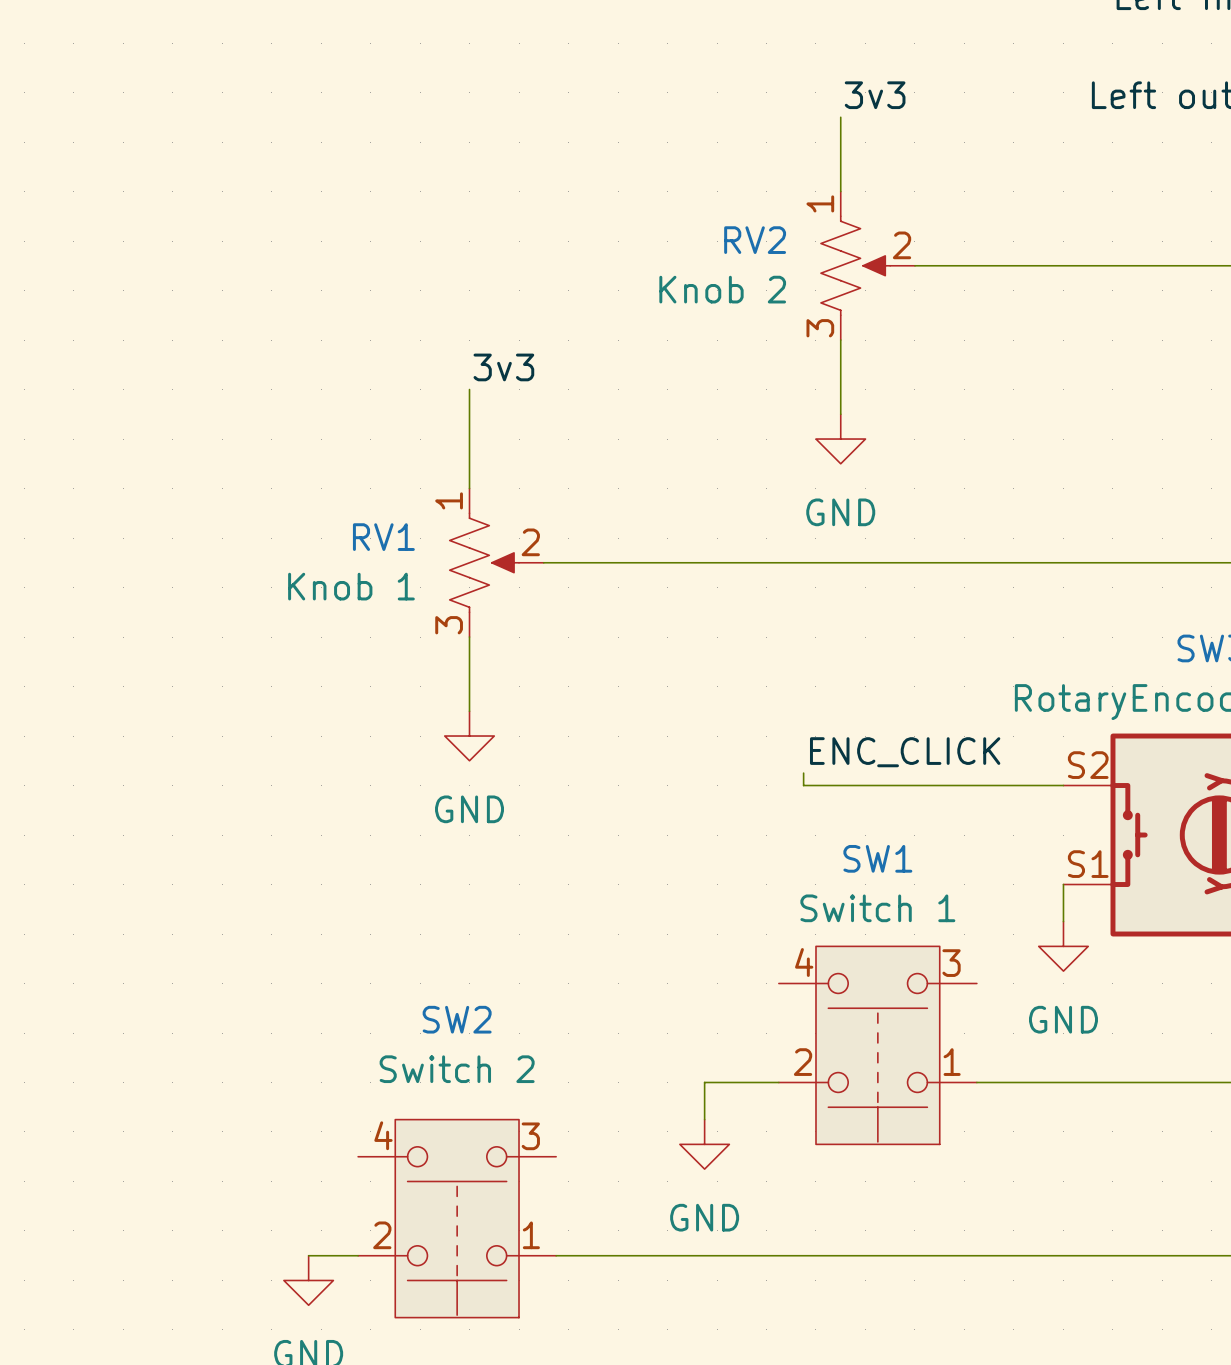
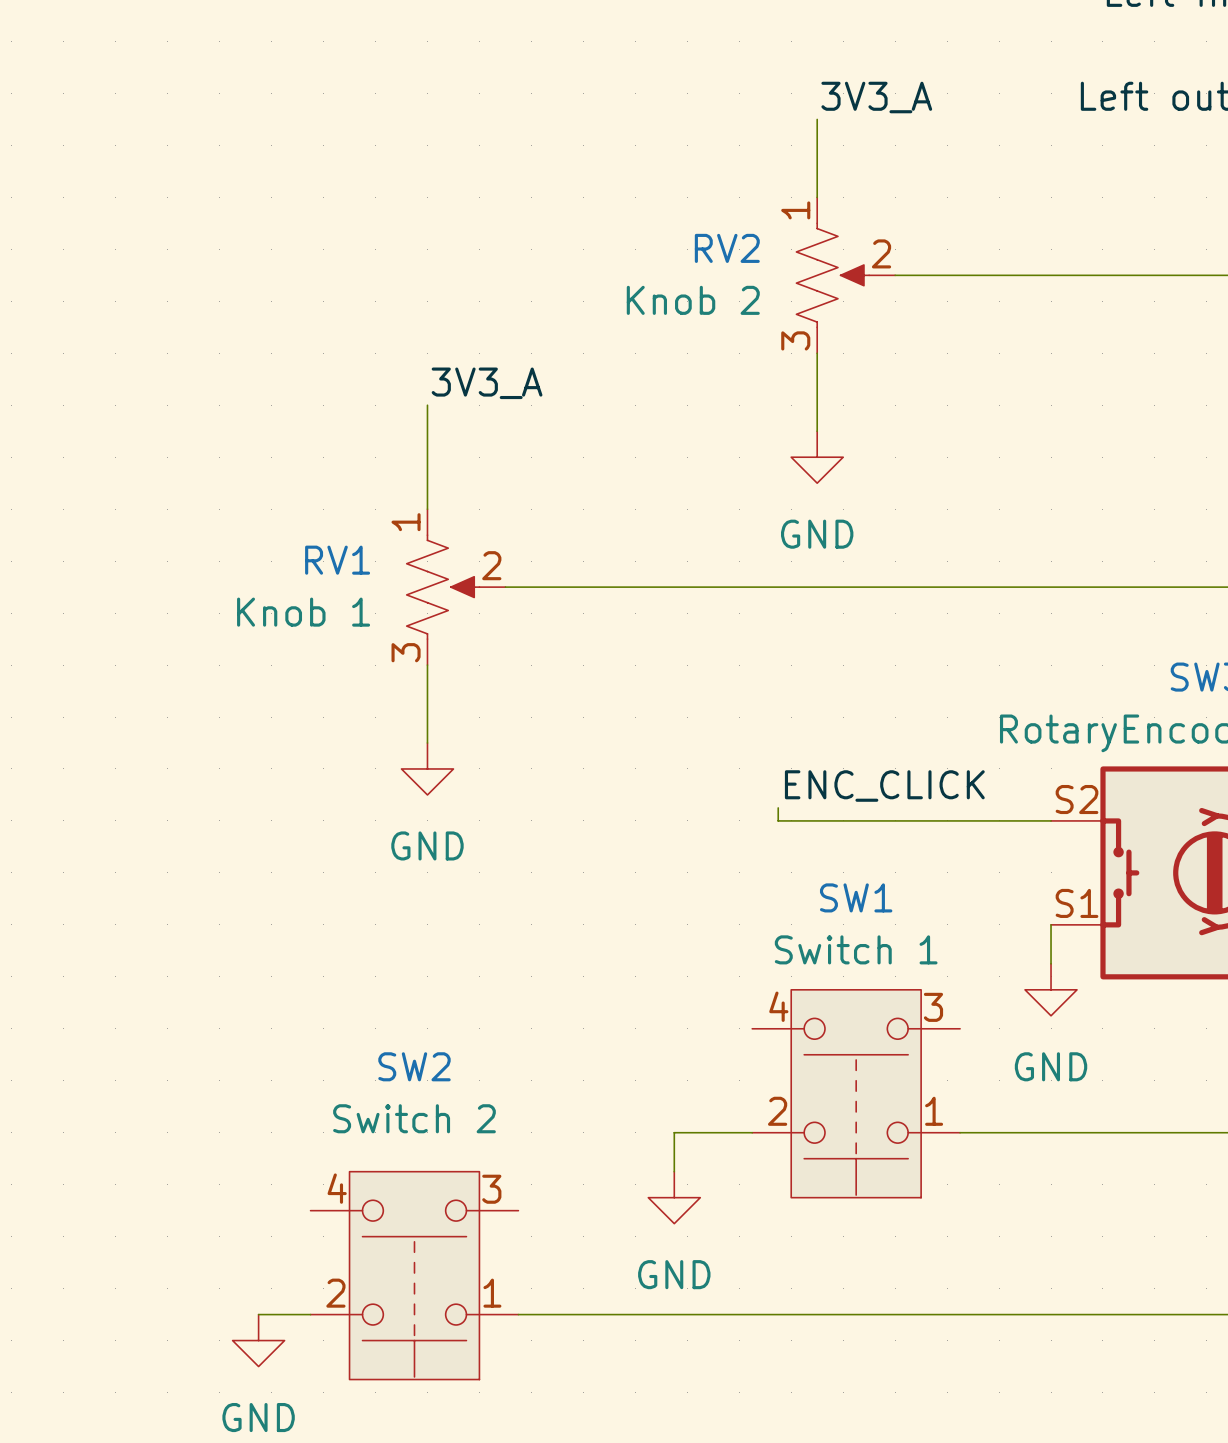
label: 3v3 (875, 95) -> 3V3_A (876, 97)
label: 3v3 (503, 367) -> 3V3_A (487, 383)

